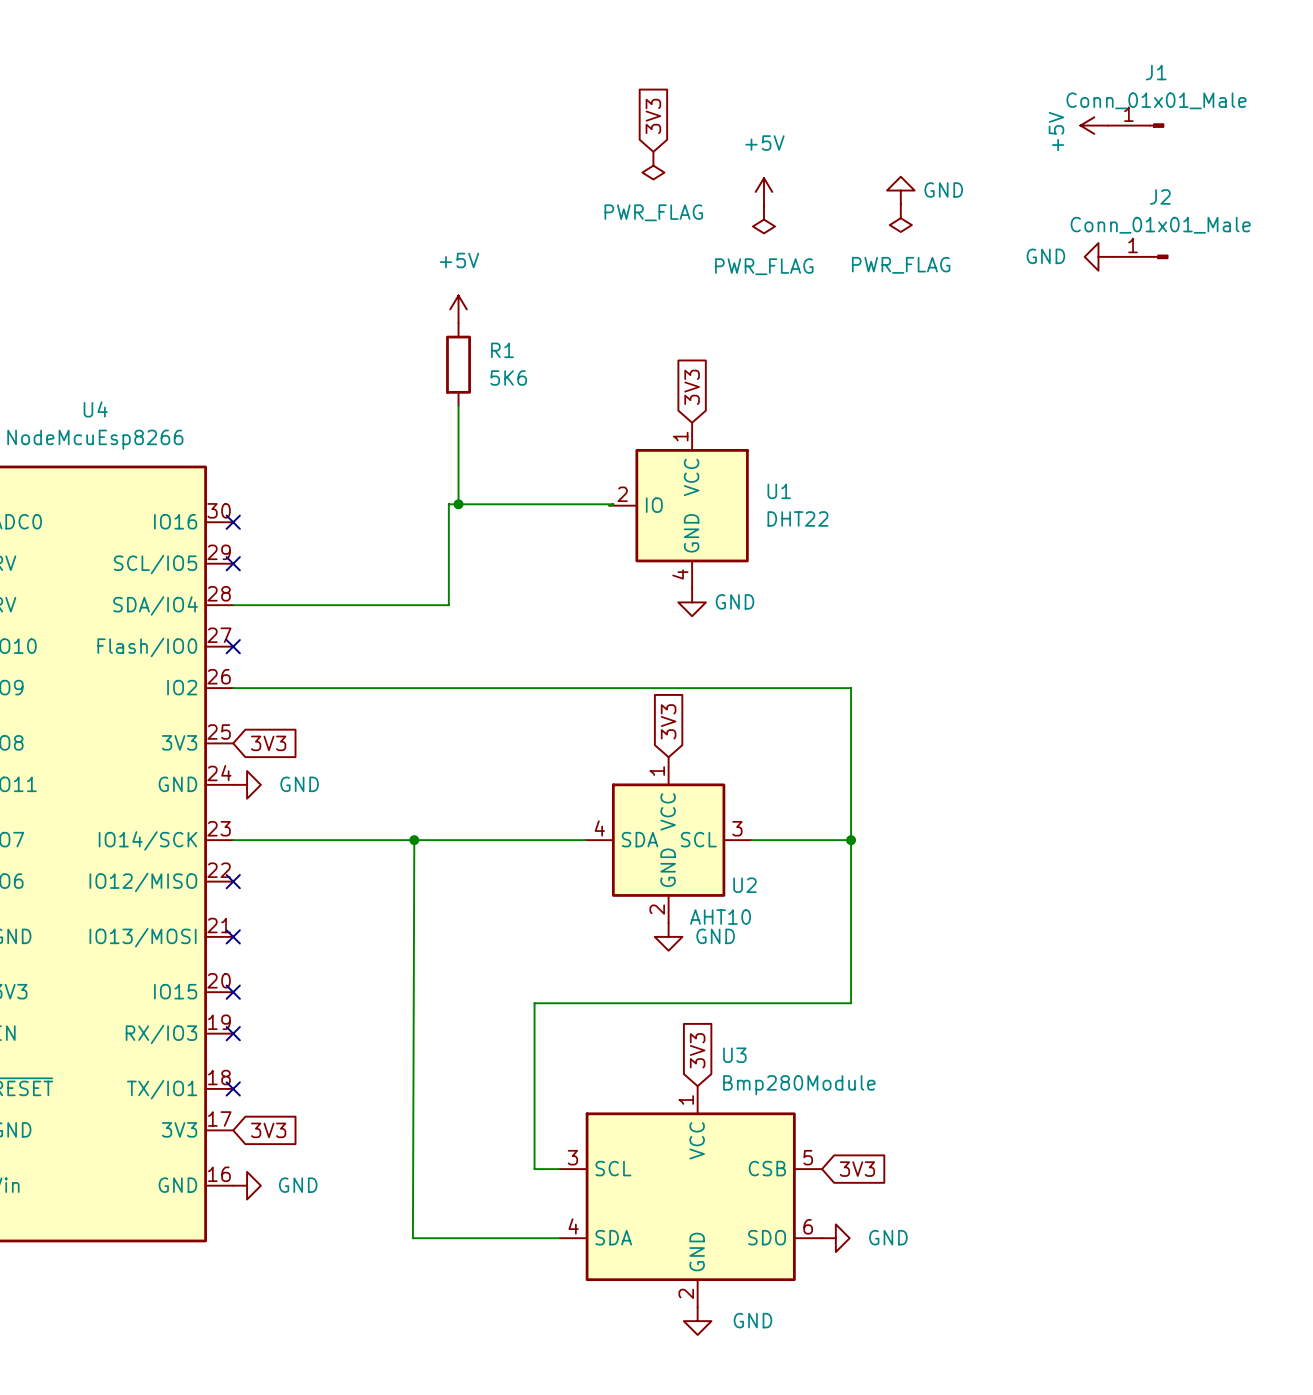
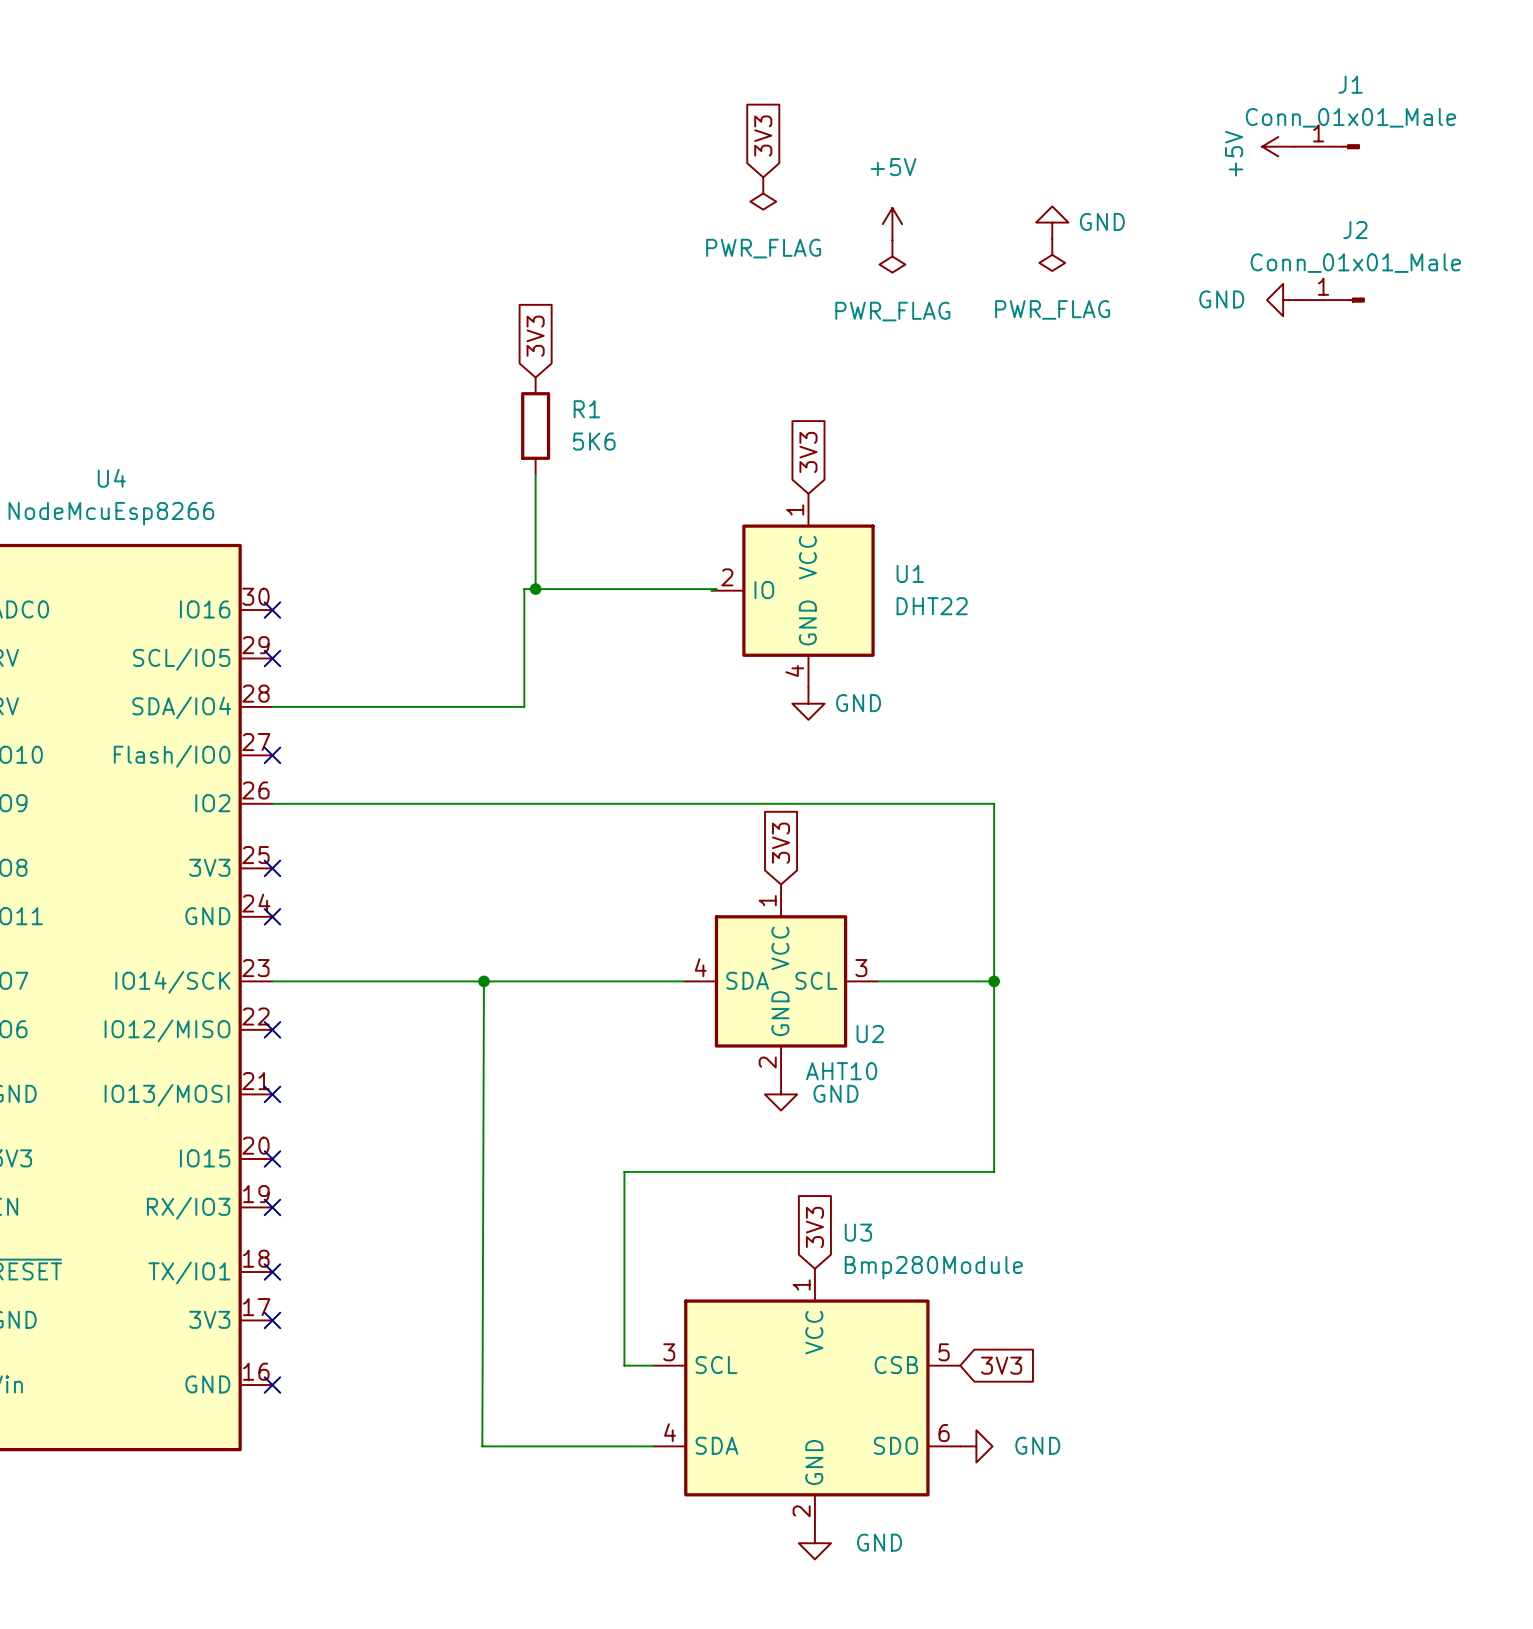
global label: none -> 3V3 (535, 336)
power symbol: +5V (458, 309) -> none
no-connect mark: none -> (272, 868)
global label: 3V3 (268, 743) -> none
no-connect mark: none -> (272, 916)
power symbol: GND (247, 784) -> none
no-connect mark: none -> (272, 1320)
global label: 3V3 (268, 1130) -> none
no-connect mark: none -> (272, 1385)
power symbol: GND (247, 1185) -> none

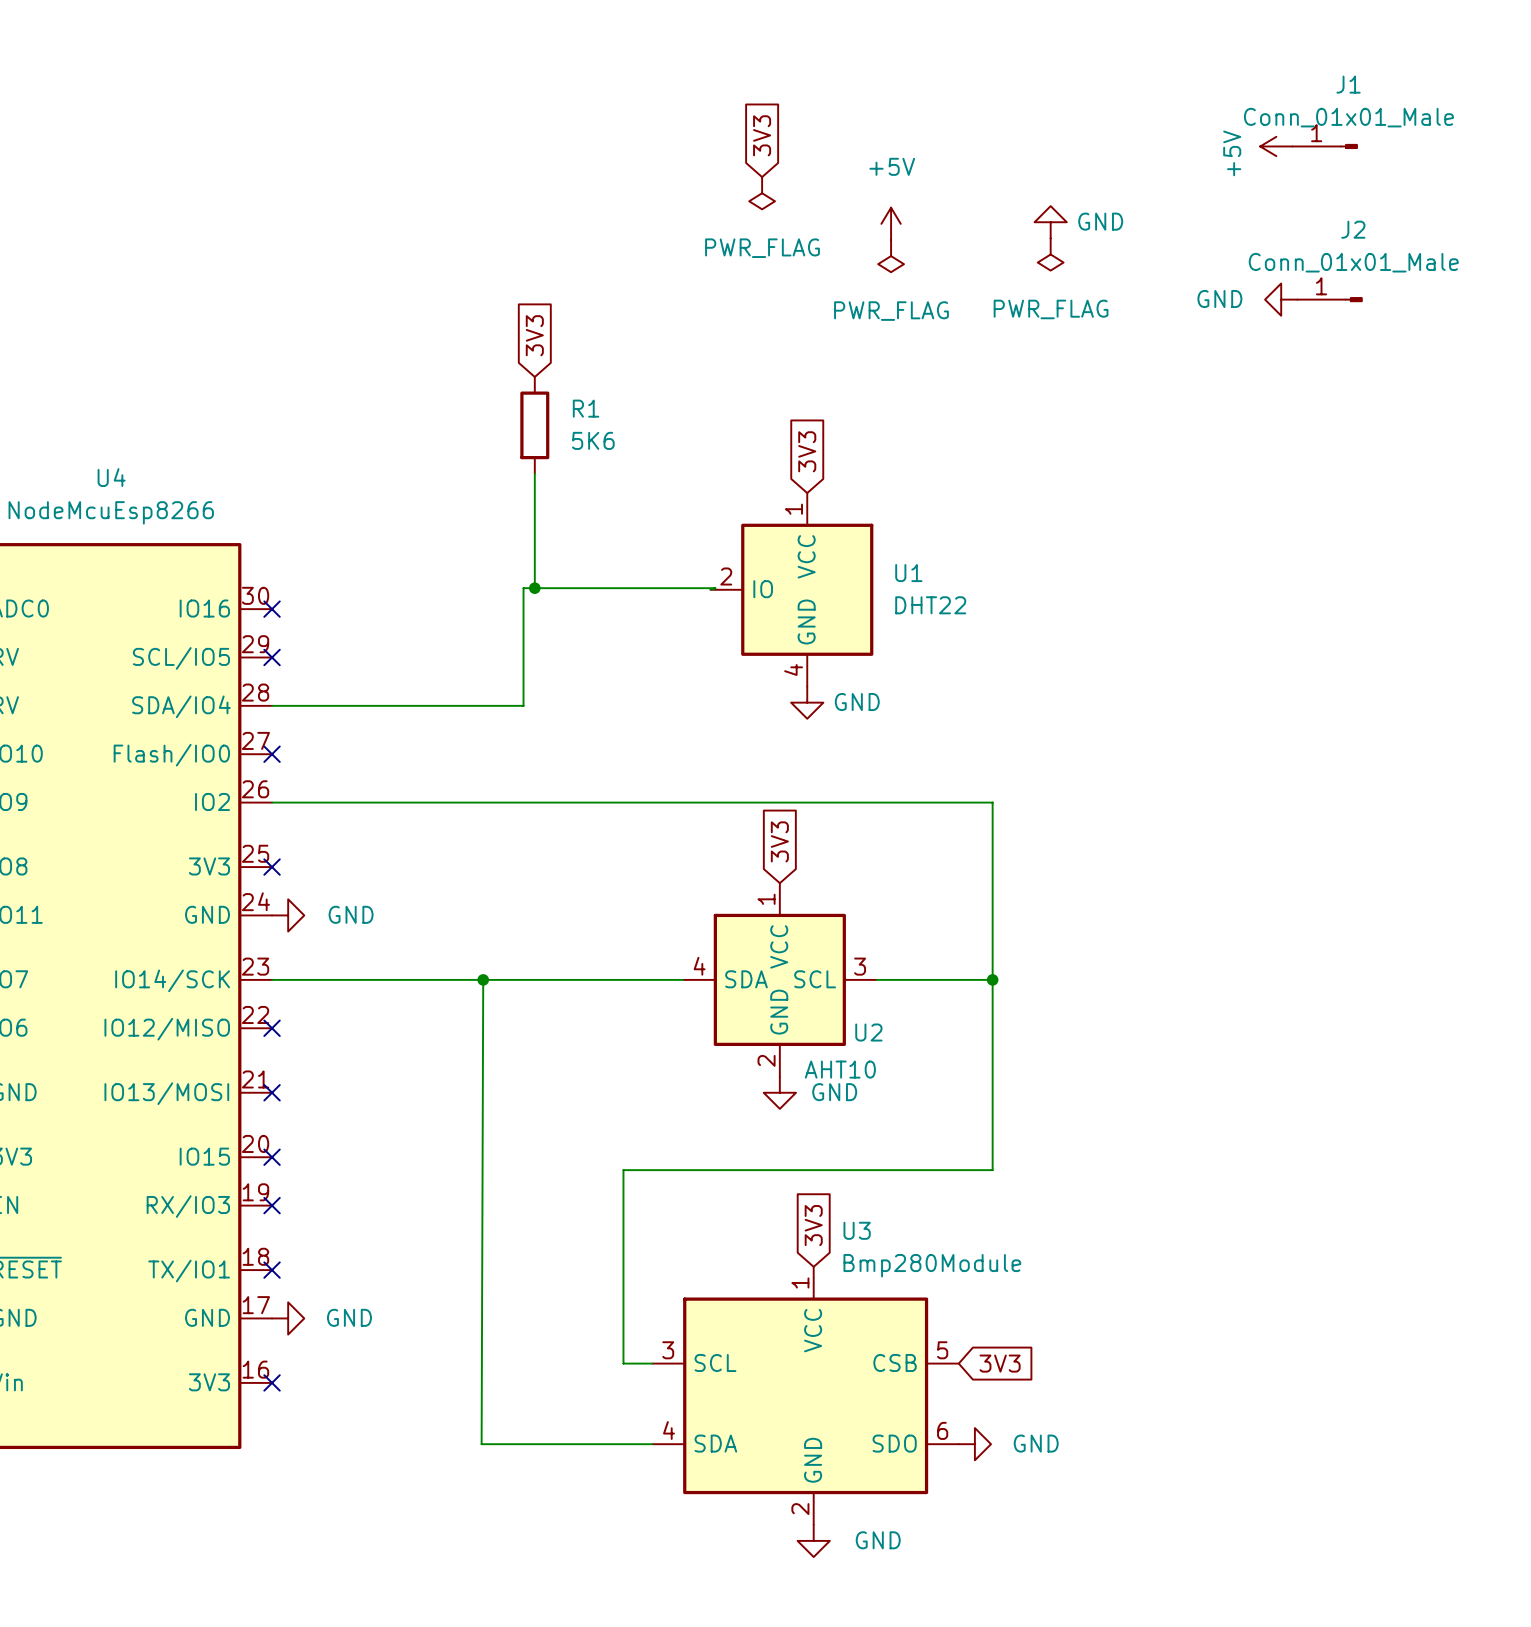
no-connect mark: (272, 916) -> none
power symbol: none -> GND (288, 915)
U4 pin name: 3V3 (209, 1319) -> GND (207, 1317)
no-connect mark: (272, 1320) -> none
power symbol: none -> GND (288, 1318)
U4 pin name: GND (207, 1384) -> 3V3 (209, 1382)

